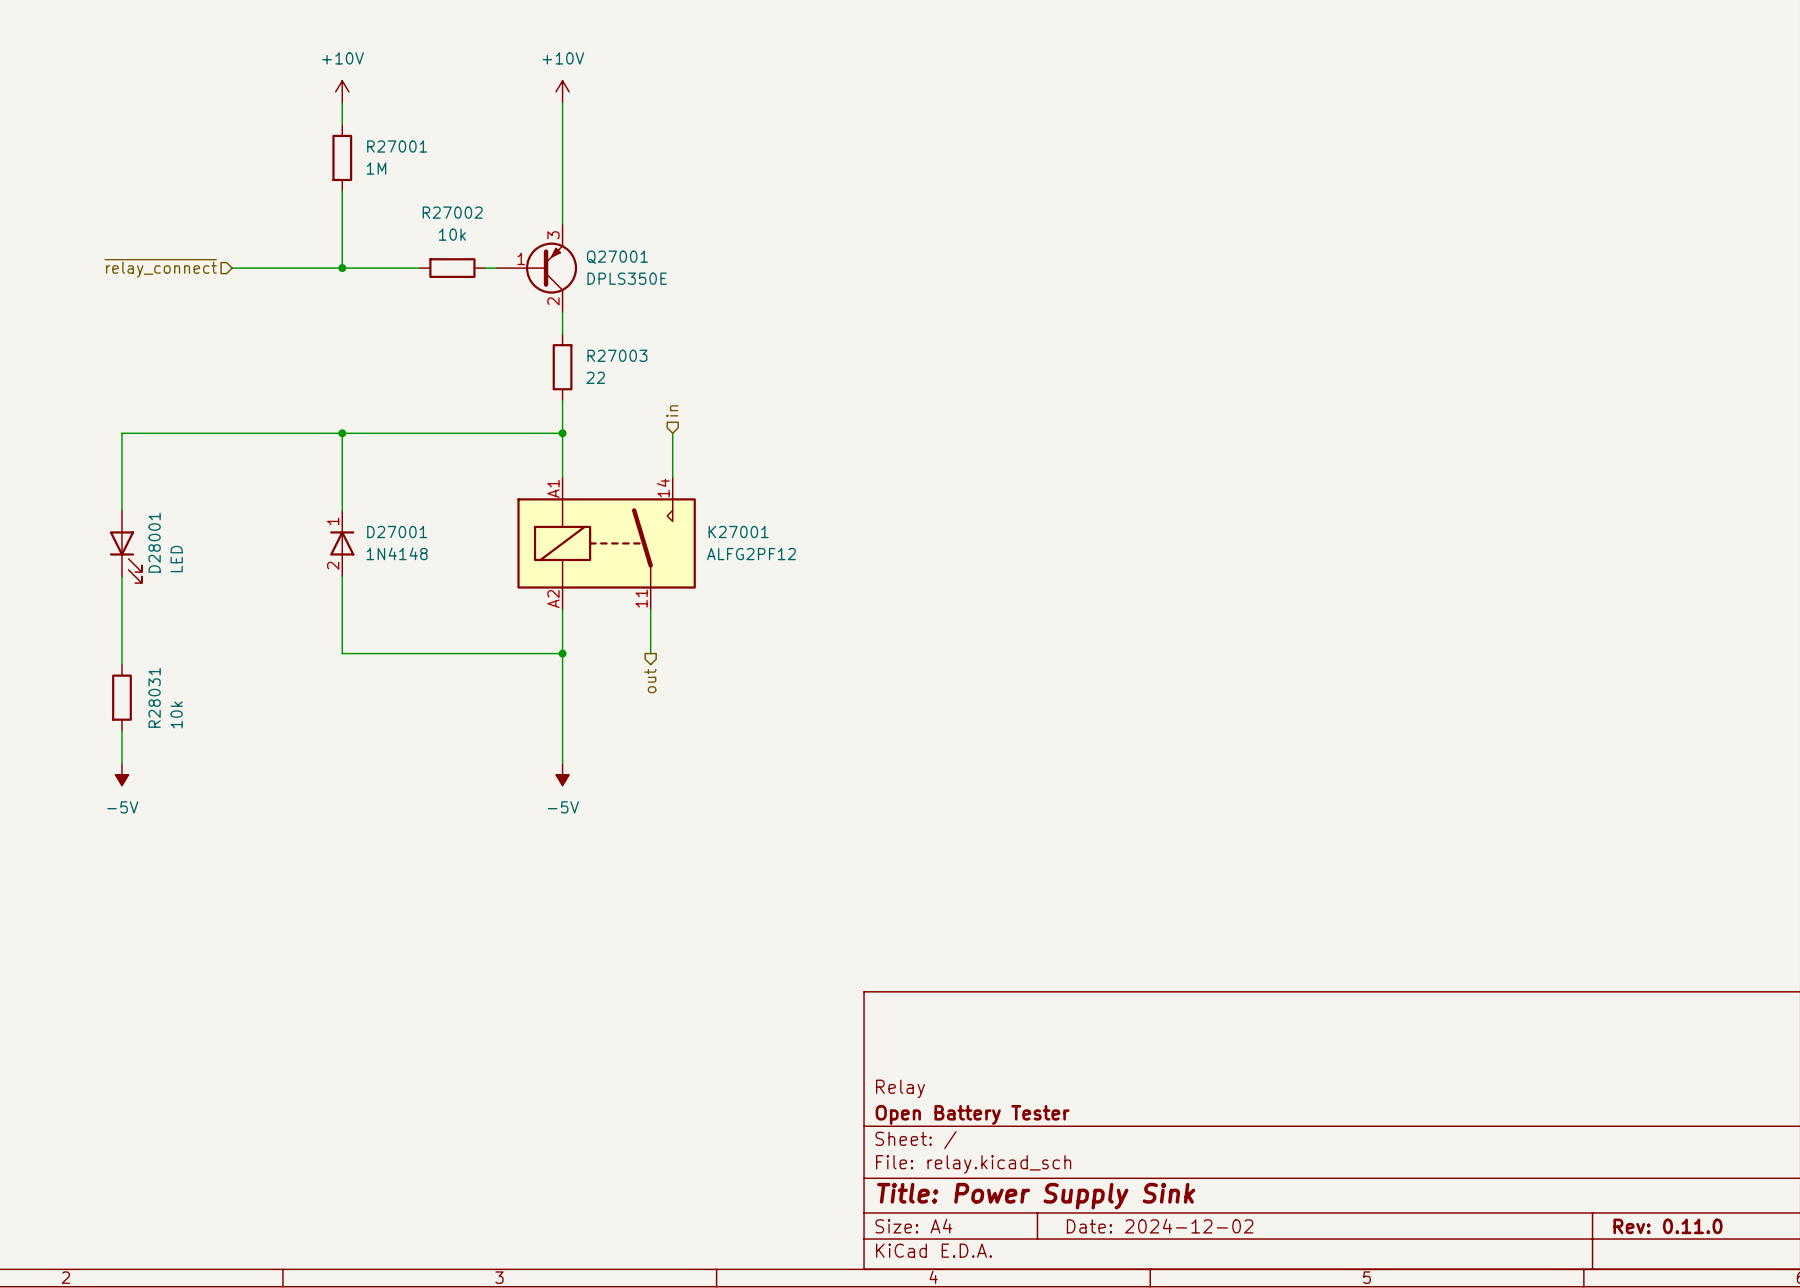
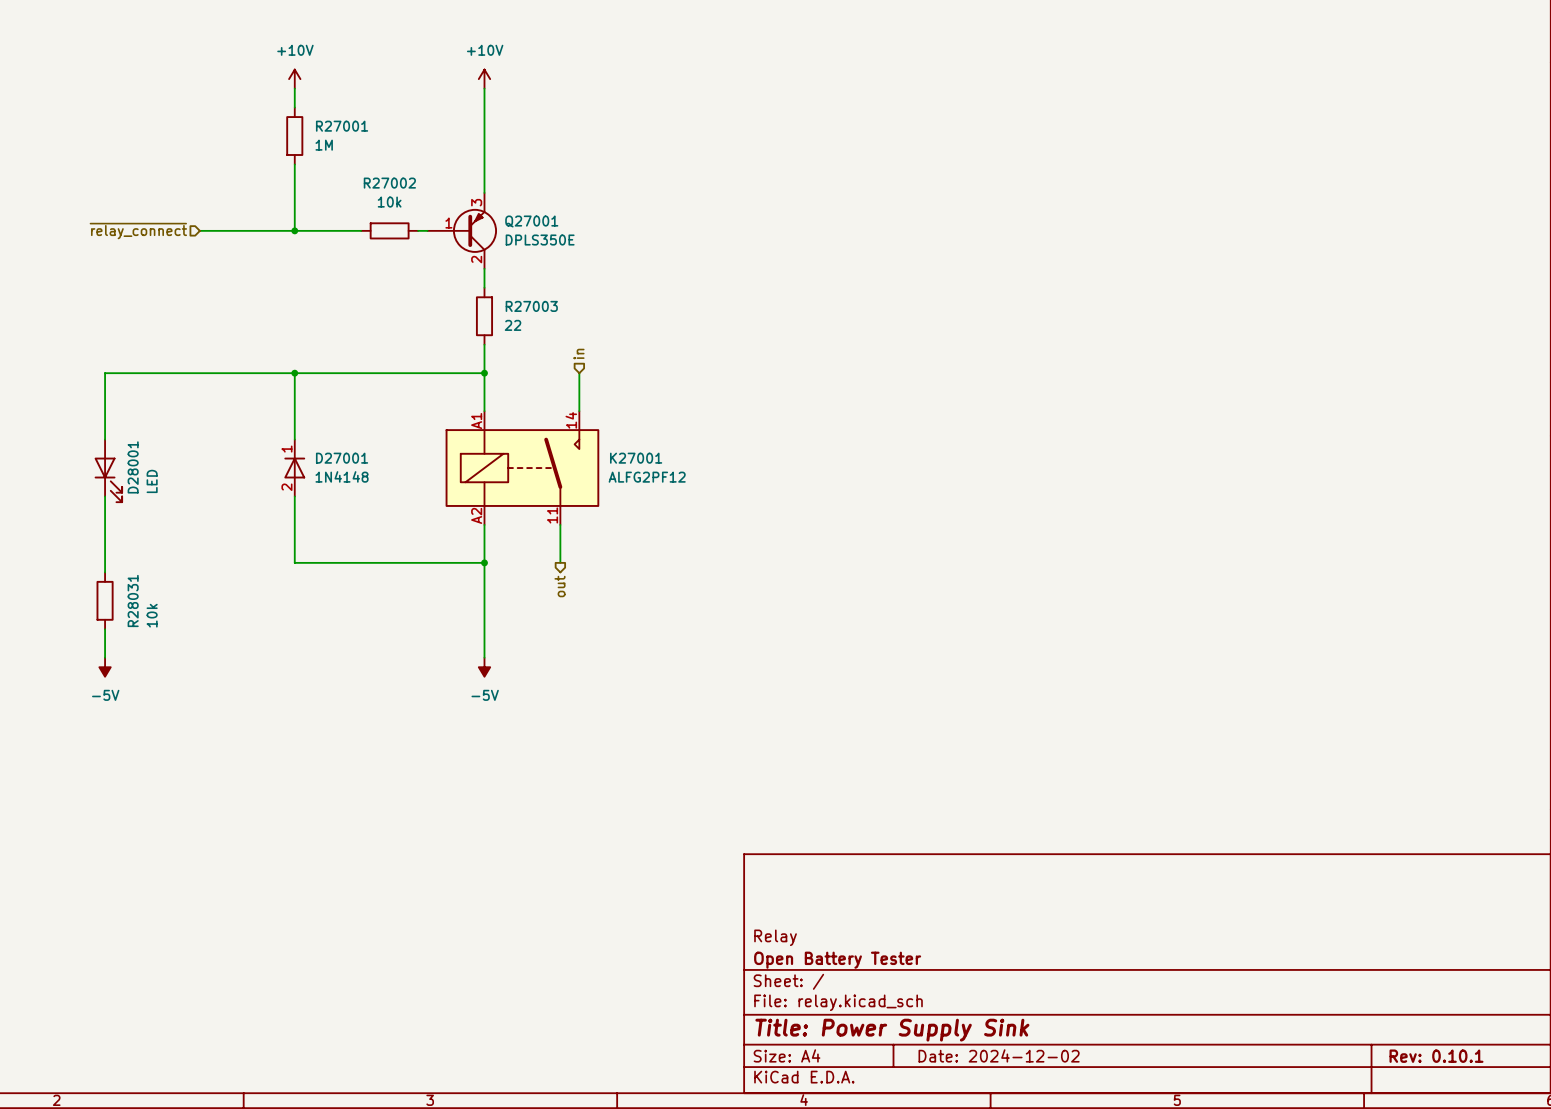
title block: Rev: 0.11.0 (1667, 1226) -> Rev: 0.10.1 (1436, 1056)

